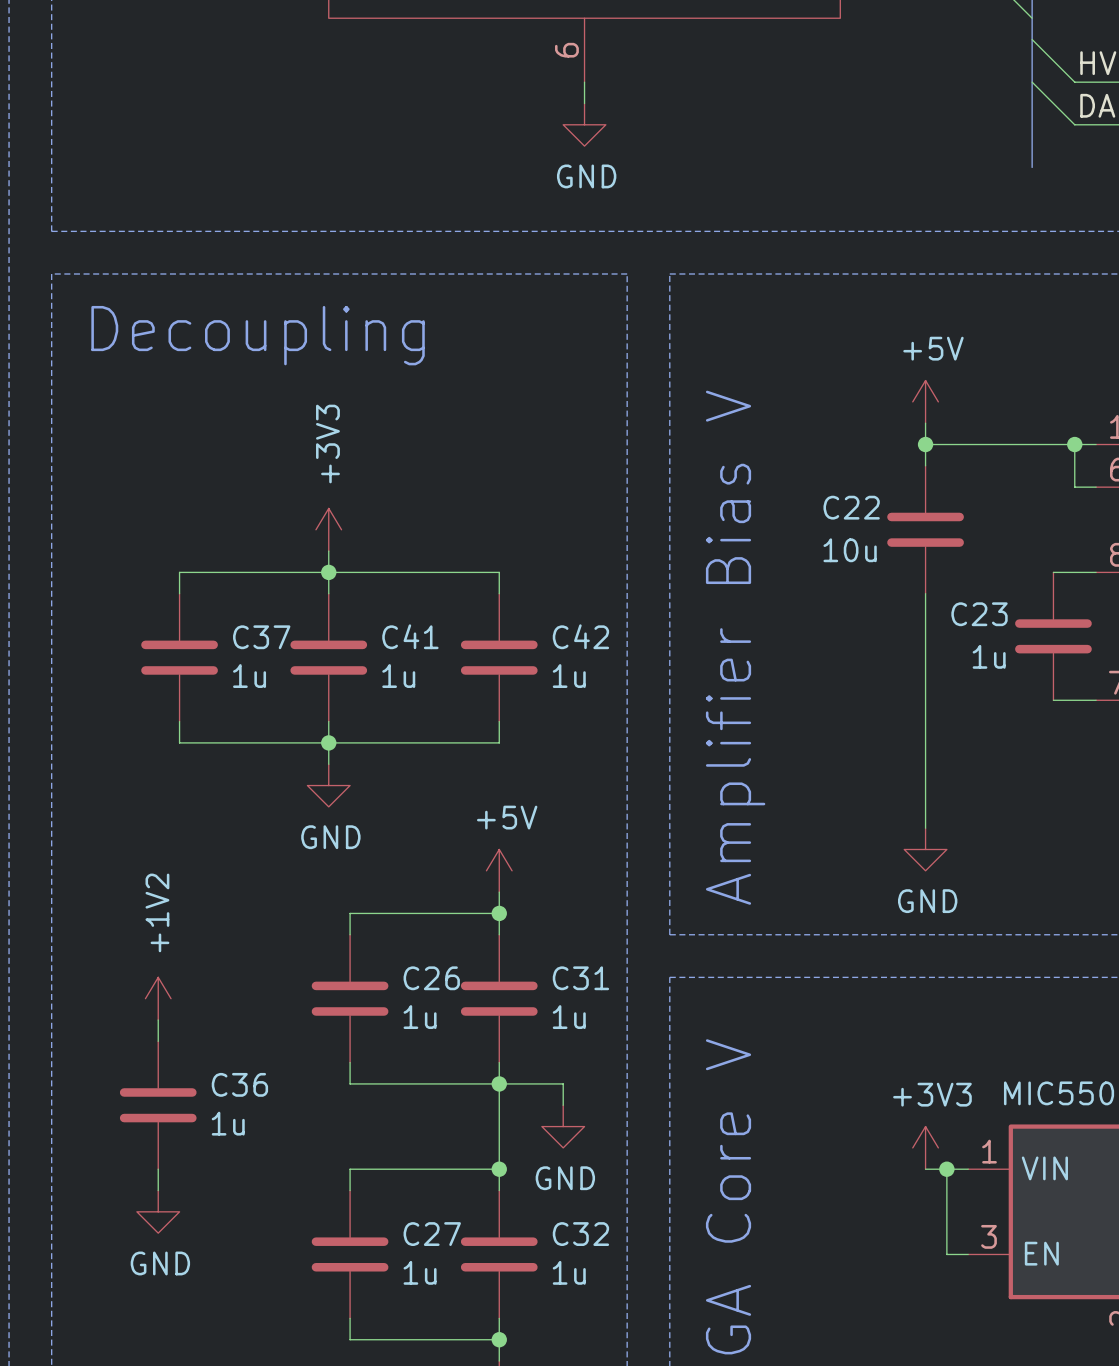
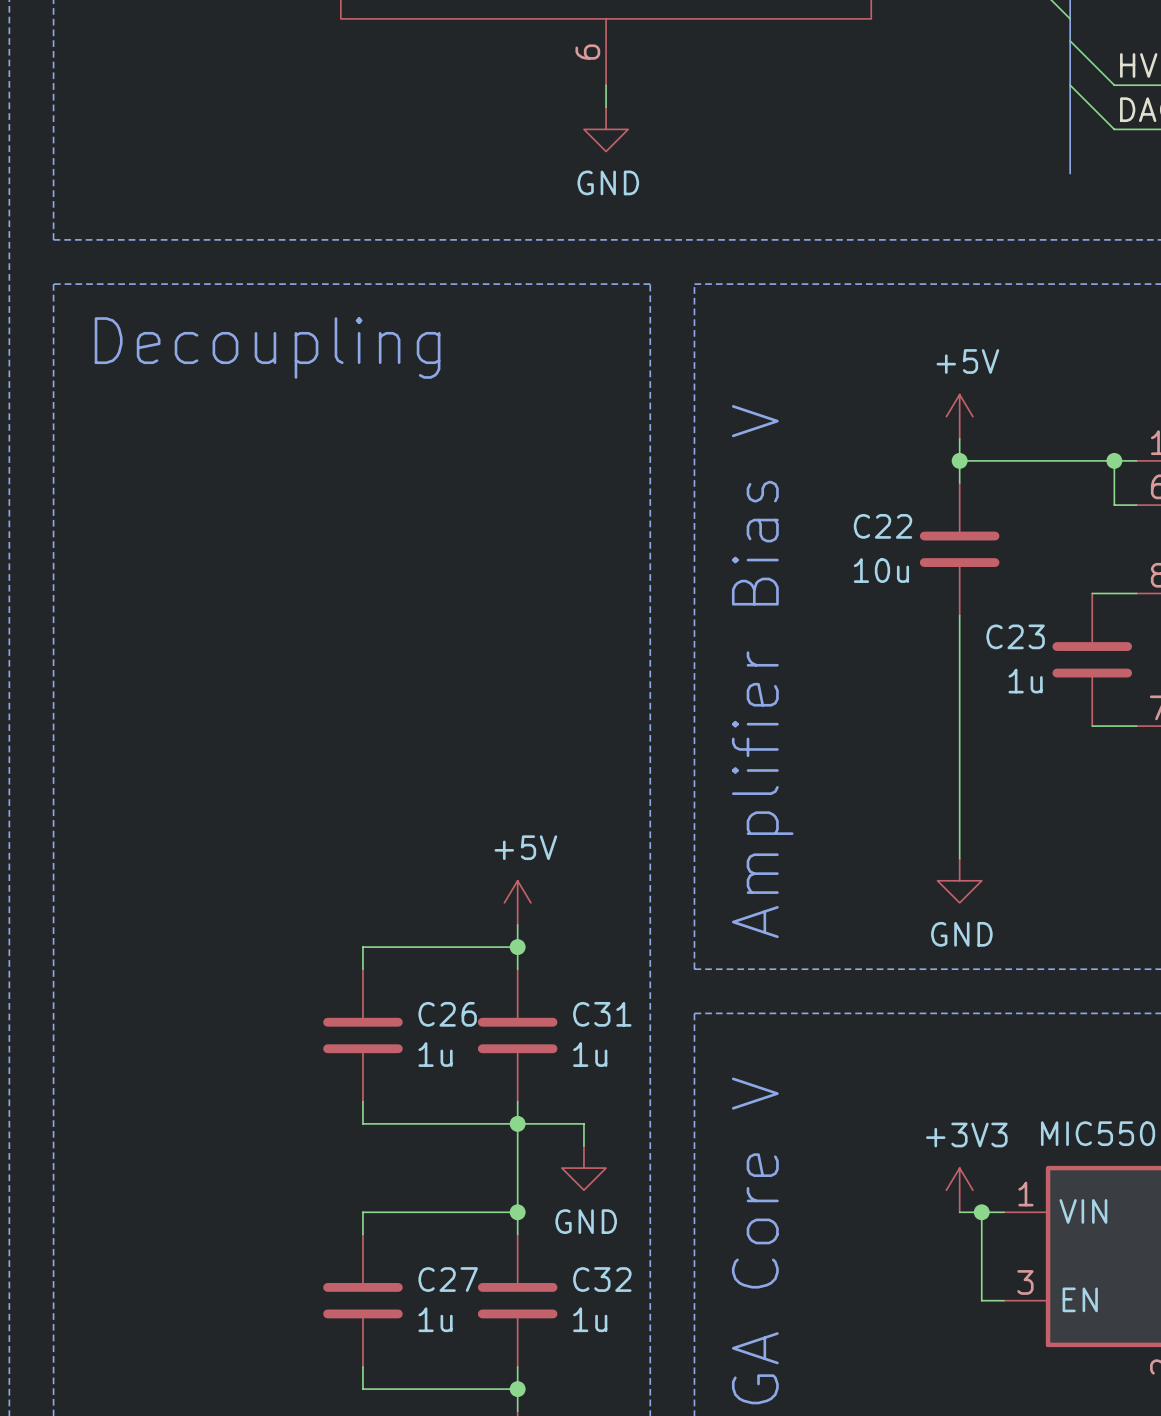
power symbol: +3V3 (328, 529) -> none
wire: (328, 551) (328, 593) -> none
junction: (328, 572) -> none
wire: (179, 593) (179, 572) (499, 572) (499, 593) -> none
C37: 1u (179, 657) -> none
C41: 1u (328, 657) -> none
C42: 1u (499, 657) -> none
wire: (179, 721) (179, 742) (499, 742) (499, 721) -> none
wire: (328, 721) (328, 764) -> none
junction: (328, 742) -> none
power symbol: GND (328, 785) -> none
power symbol: +1V2 (158, 998) -> none
wire: (158, 1020) (158, 1041) -> none
C36: 1u (158, 1105) -> none
wire: (158, 1169) (158, 1190) -> none
power symbol: GND (158, 1211) -> none

